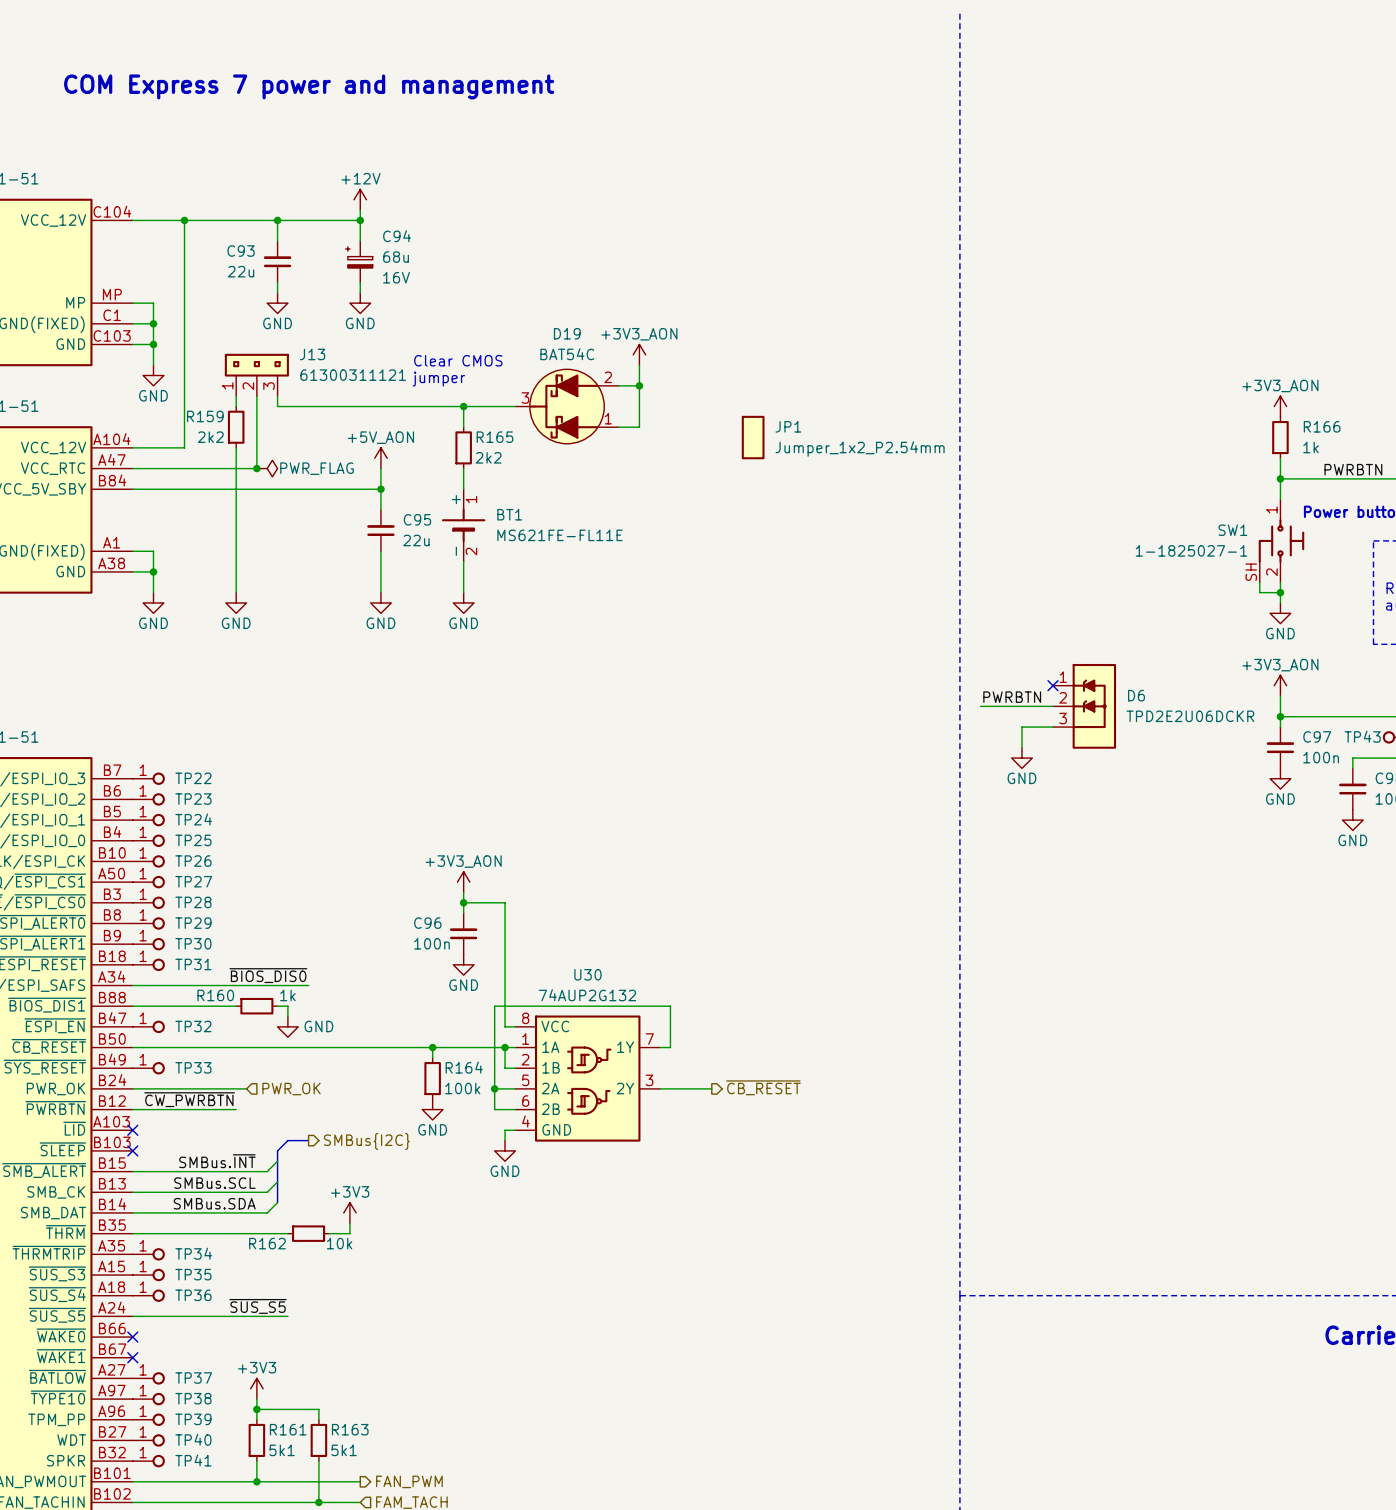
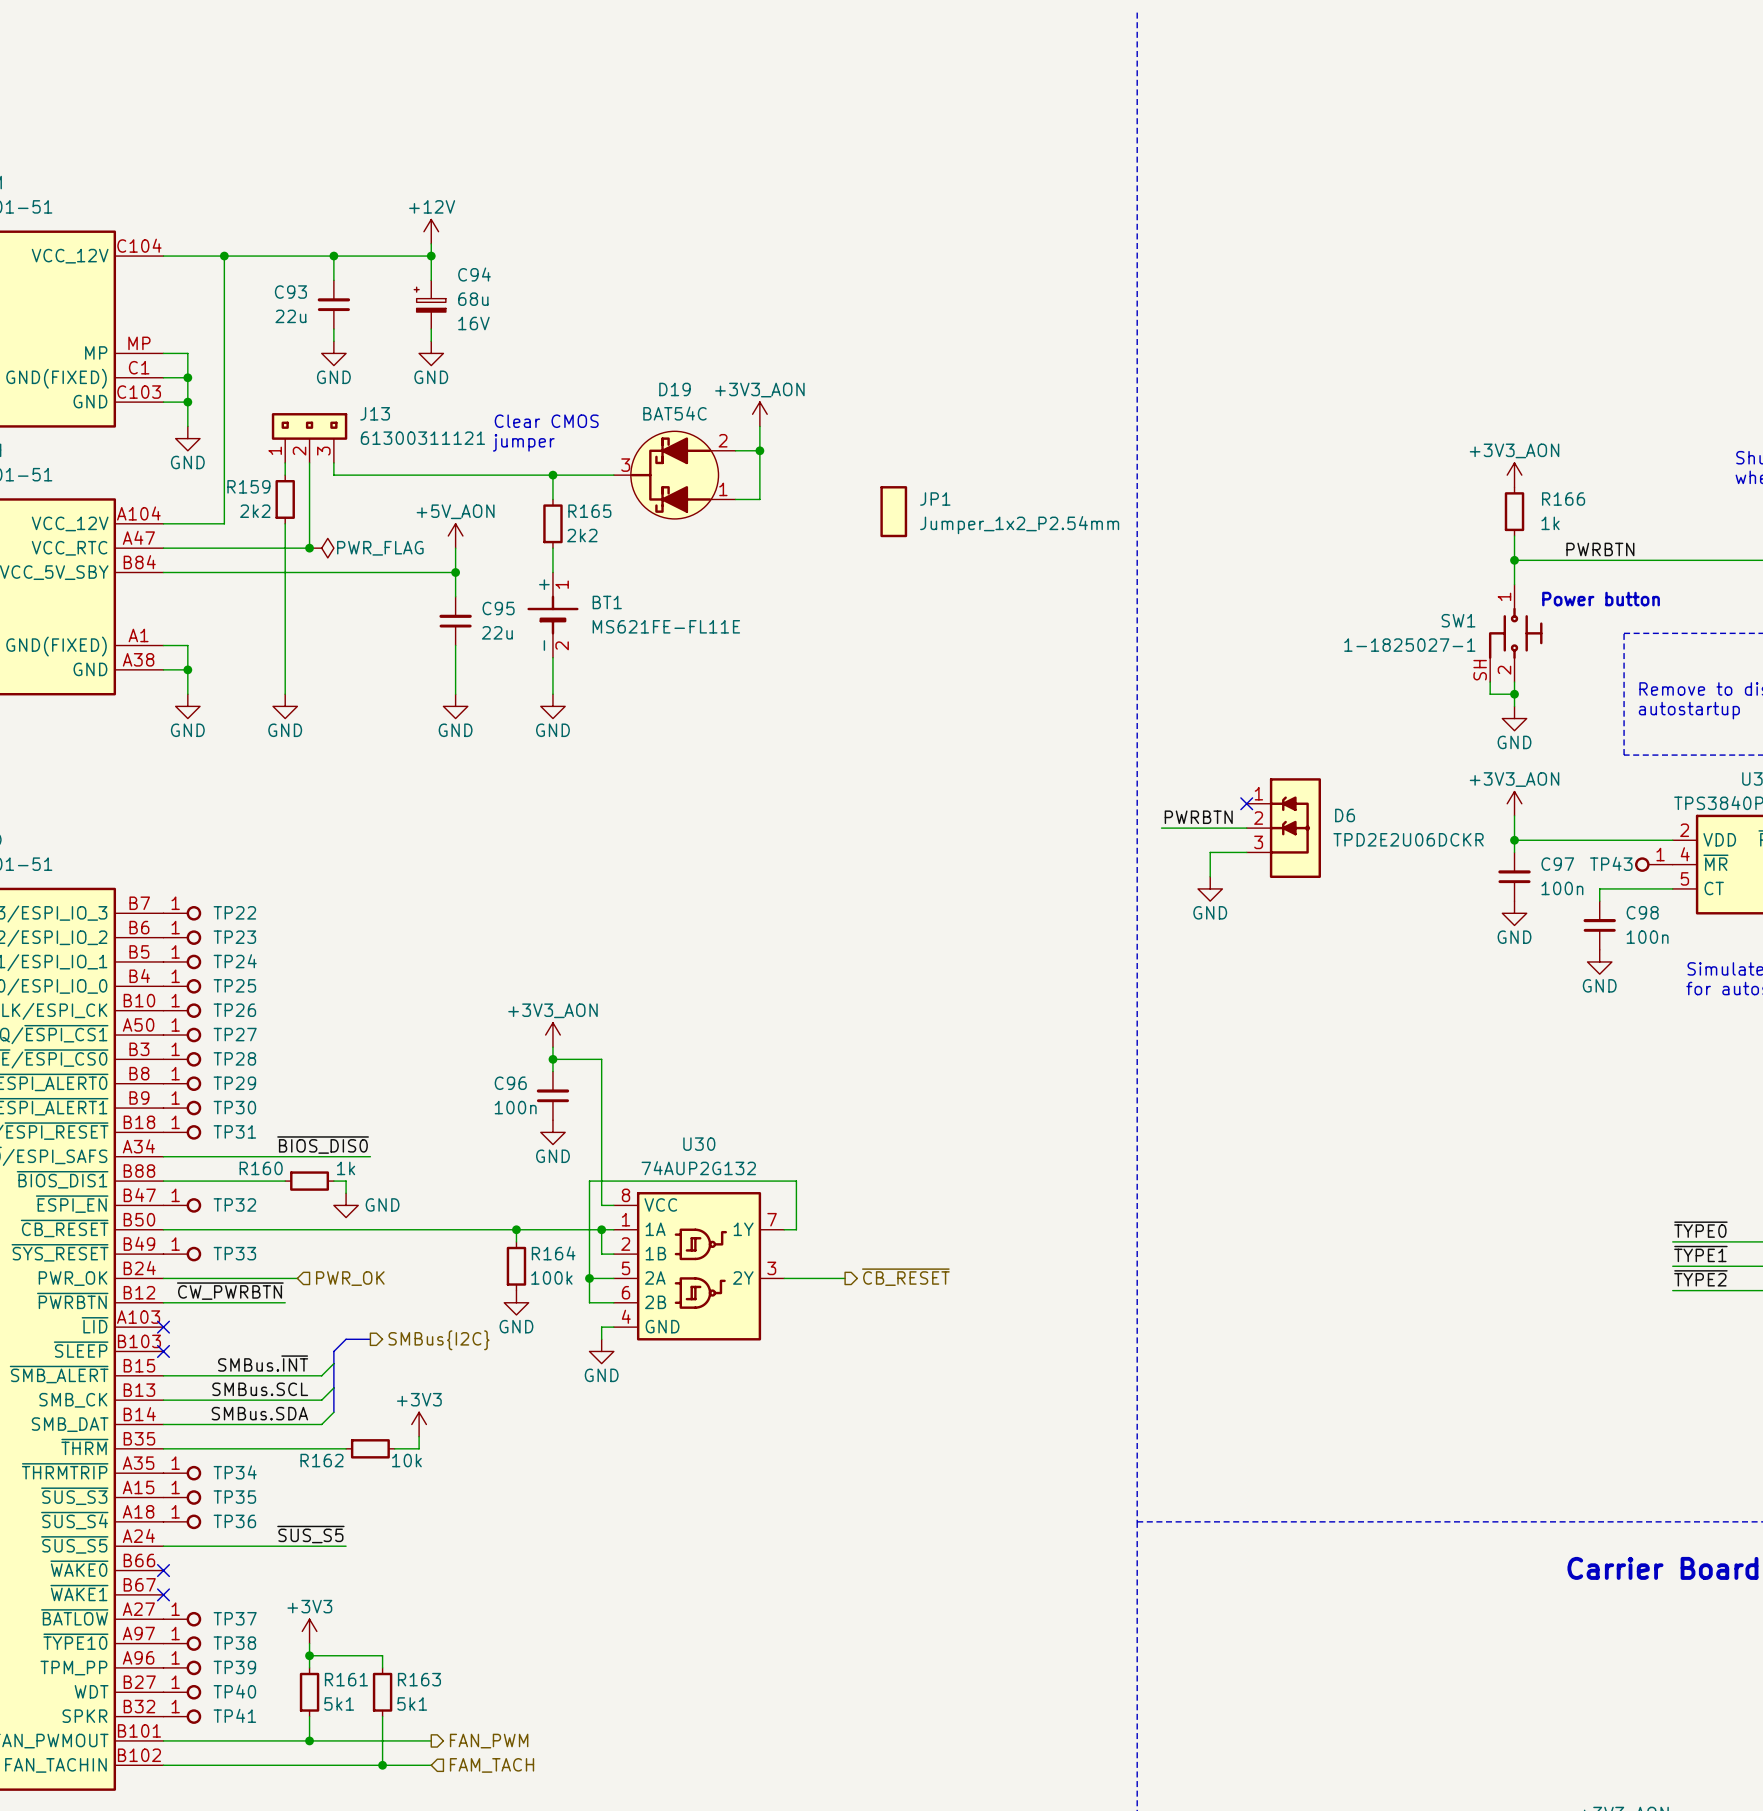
text: COM Express 7 power and management (309, 86) -> none

